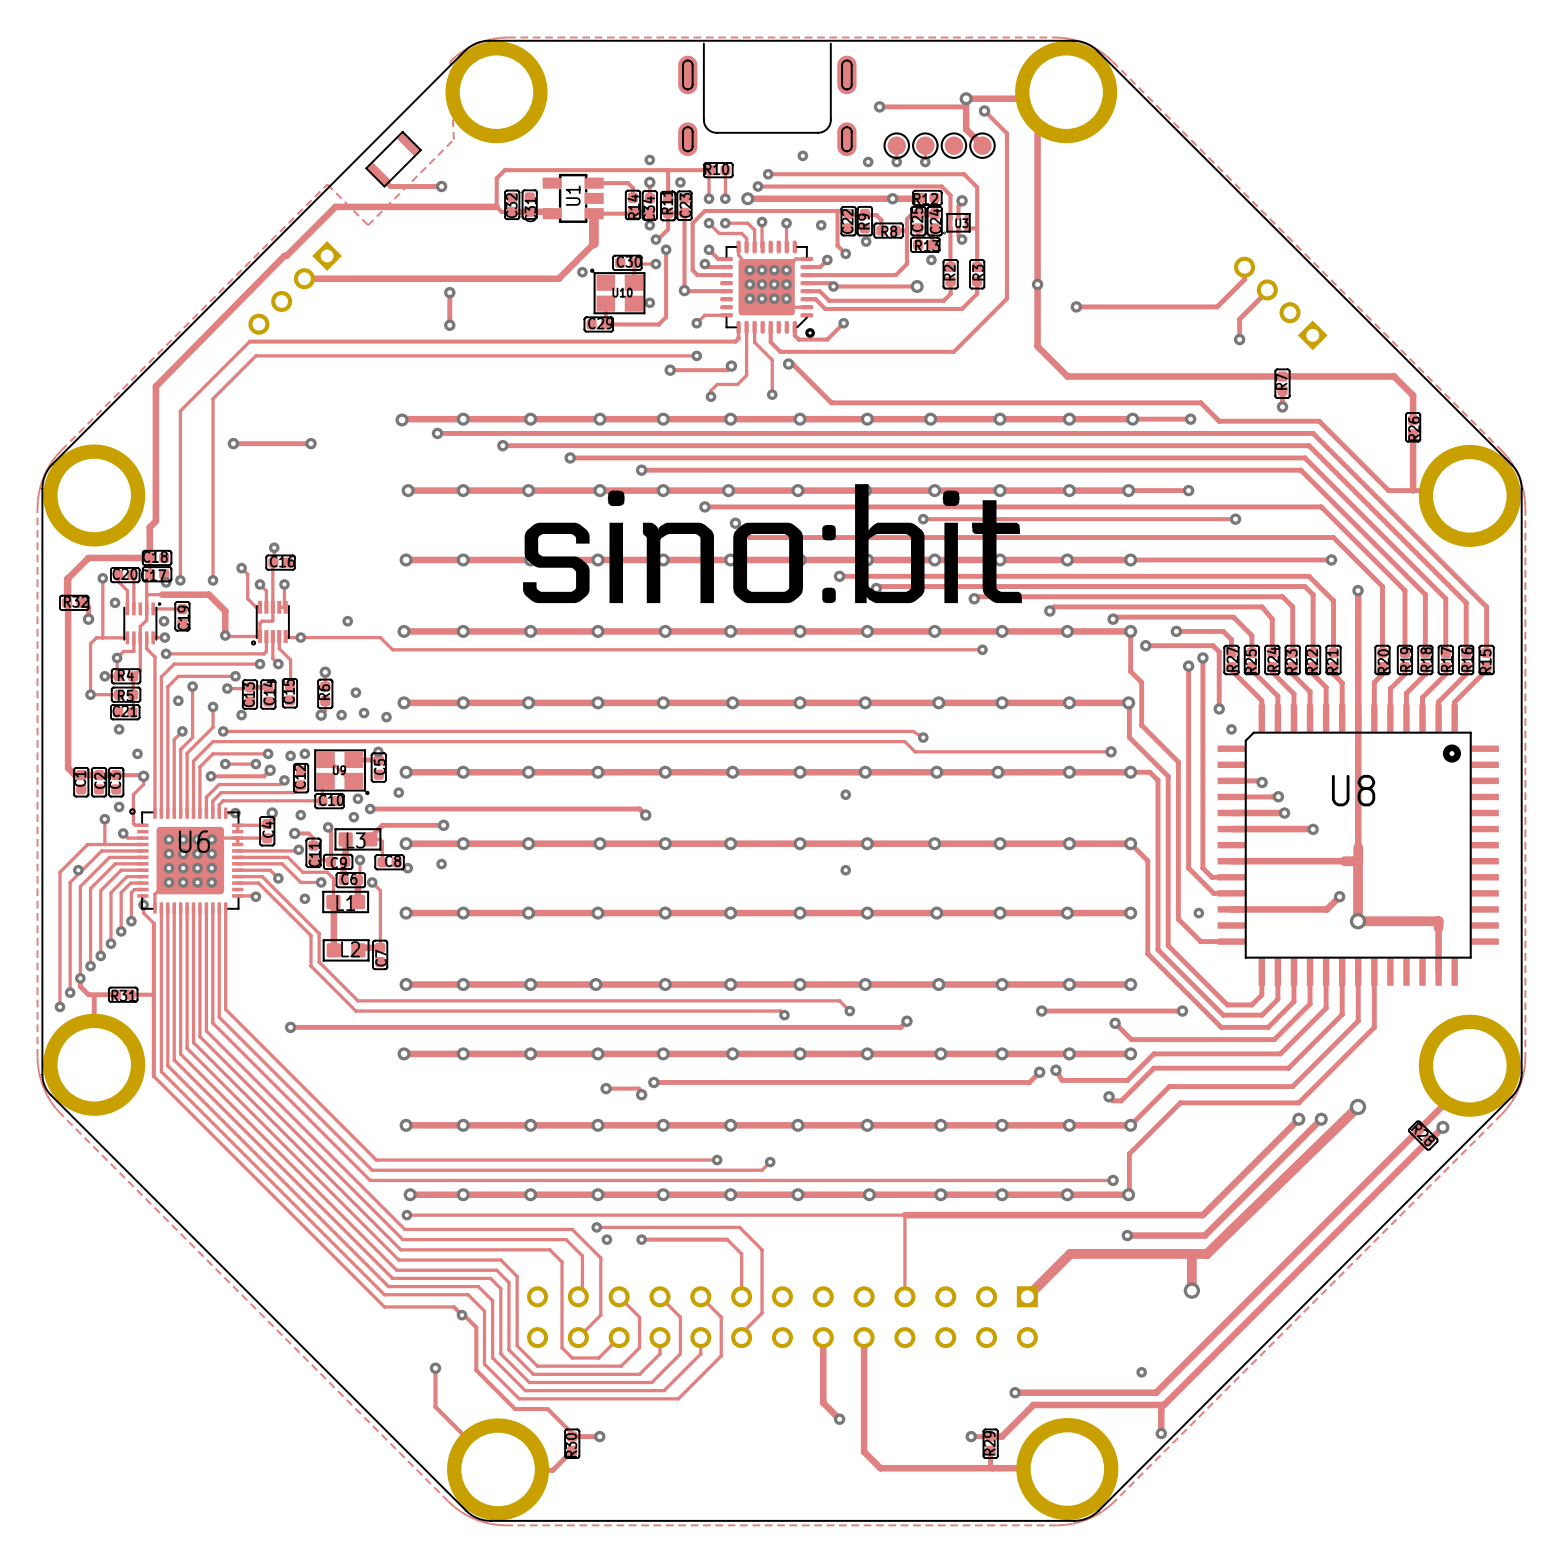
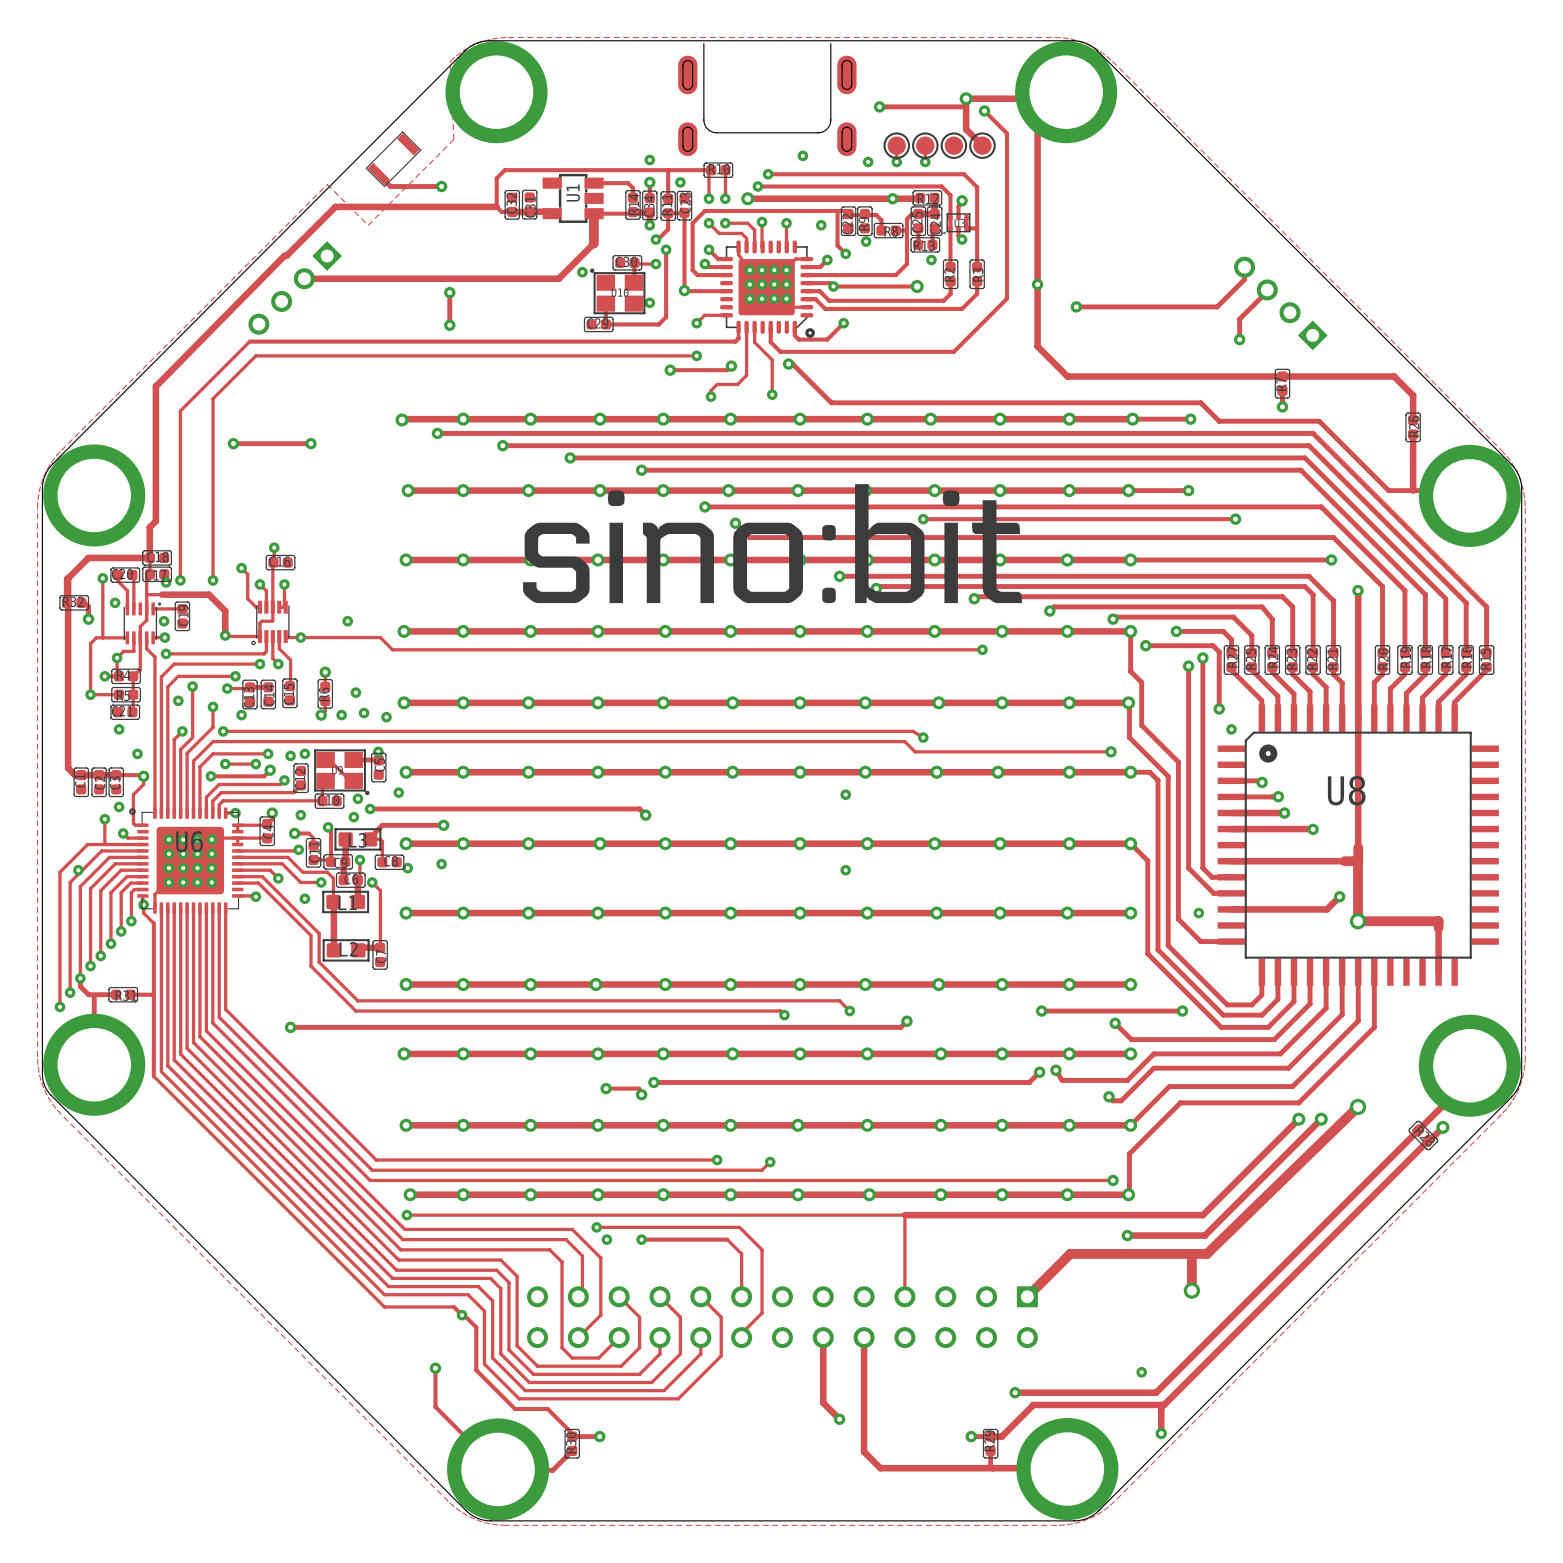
part footprint: [1217, 704, 1499, 986] -> [1217, 704, 1499, 986]

